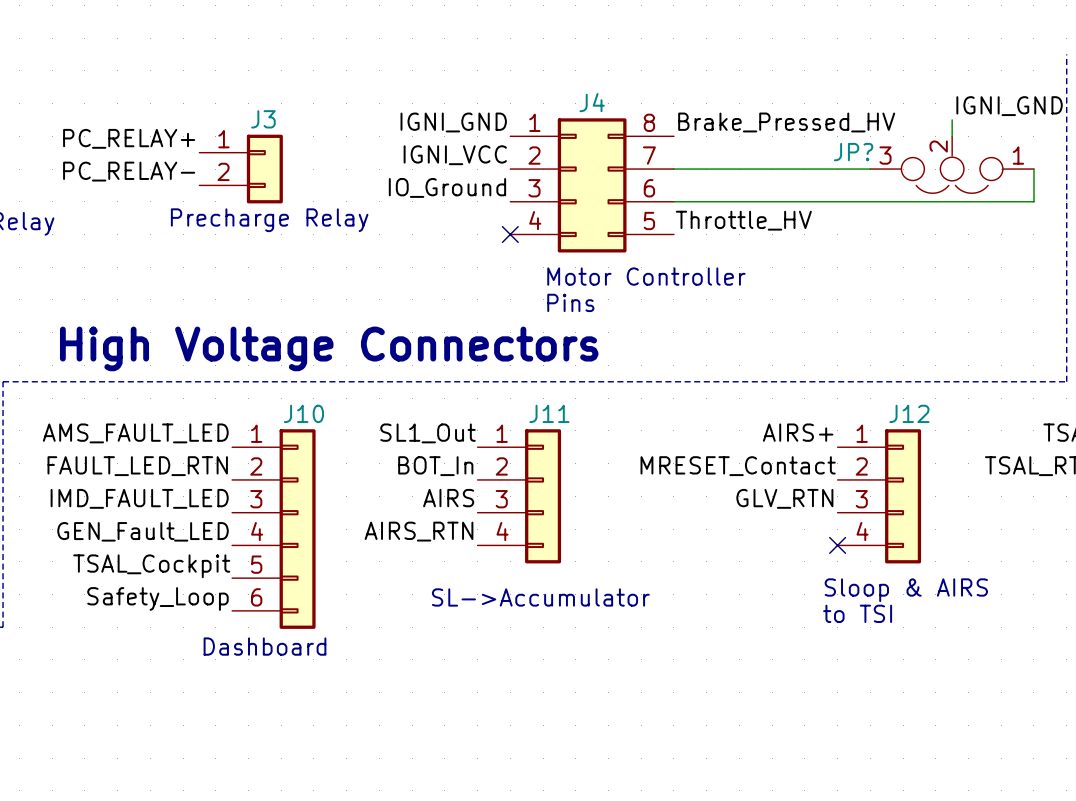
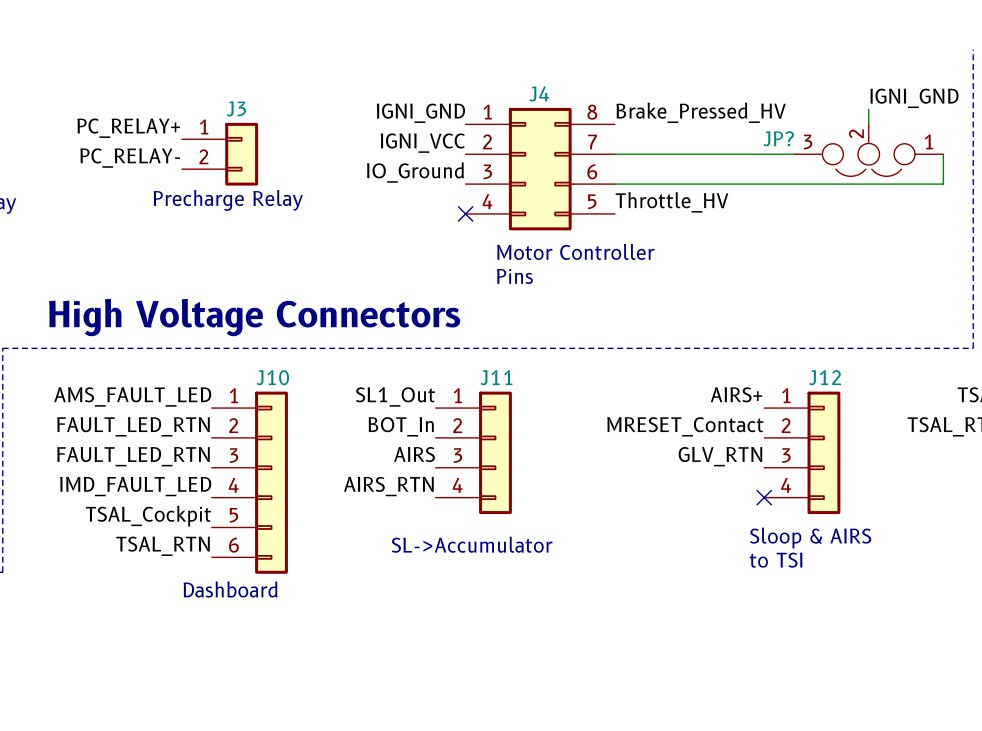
label: IMD_FAULT_LED (139, 498) -> FAULT_LED_RTN (133, 456)
label: GEN_Fault_LED (143, 531) -> IMD_FAULT_LED (135, 486)
label: Safety_Loop (157, 599) -> TSAL_RTN (163, 546)

